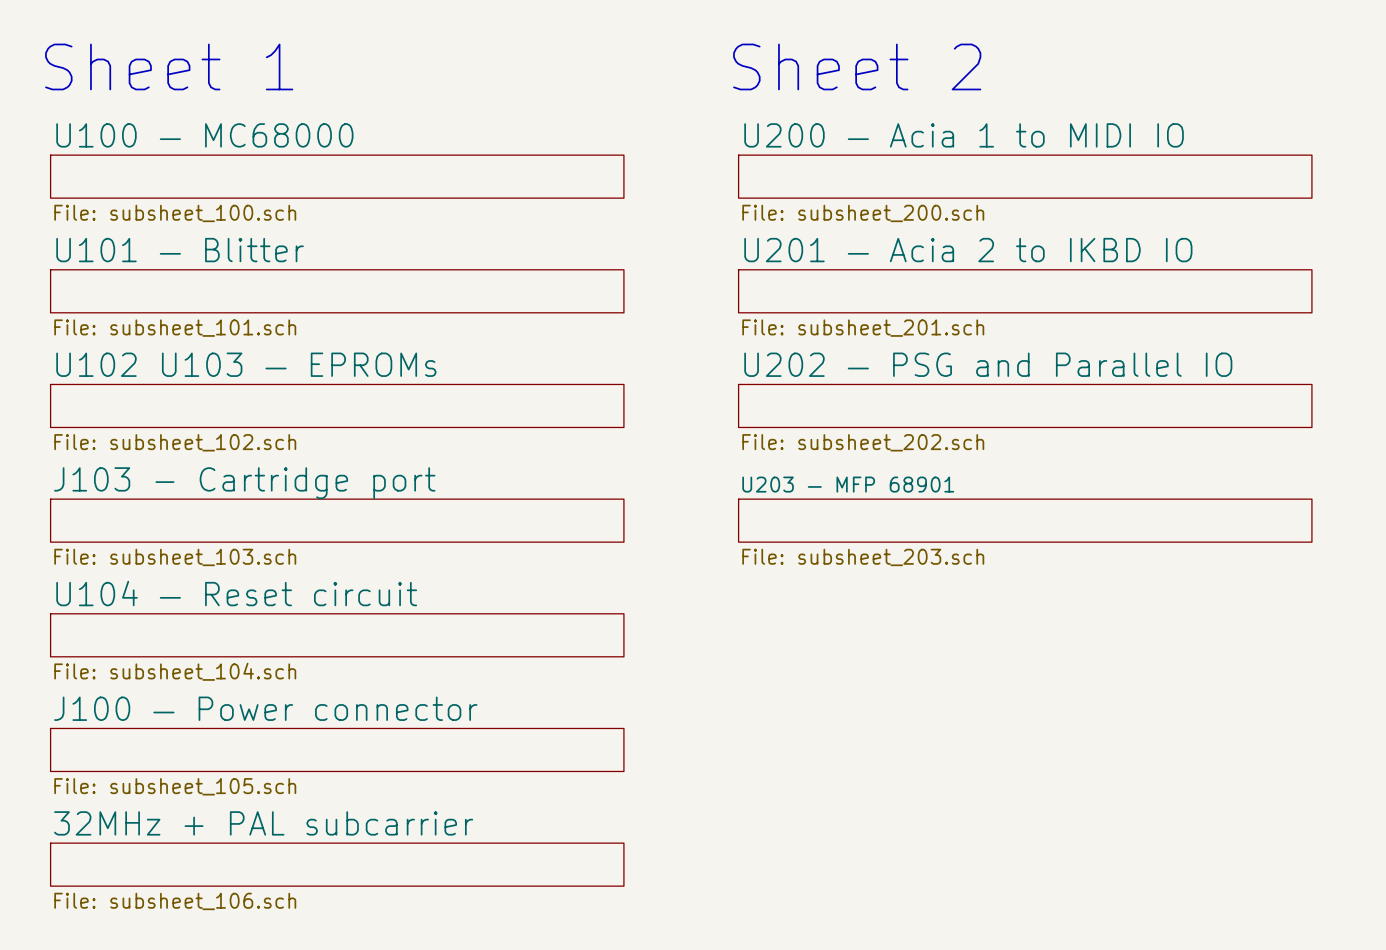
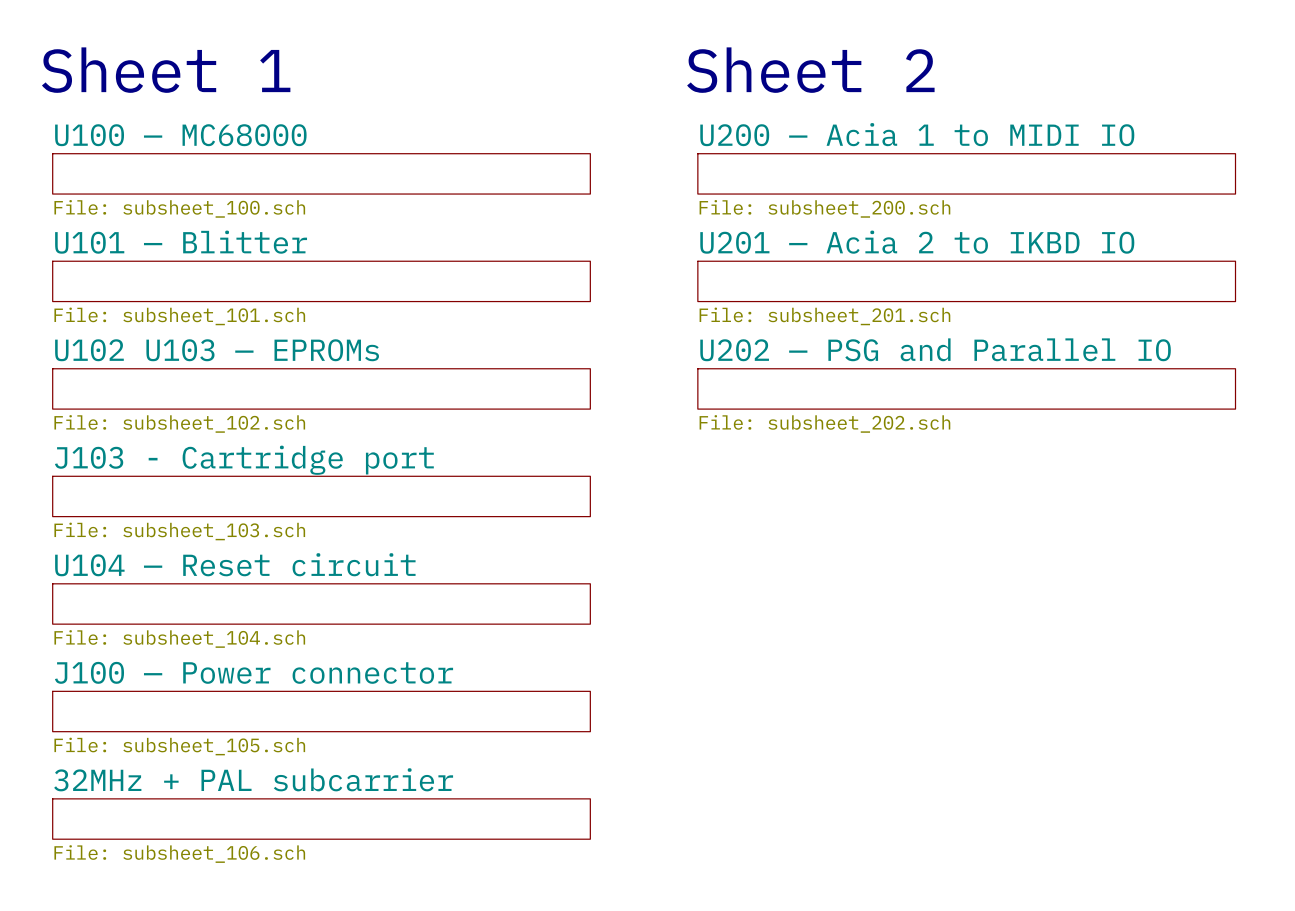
sheet U203 — MFP 68901: File: subsheet_203.sch (1025, 520) -> none

